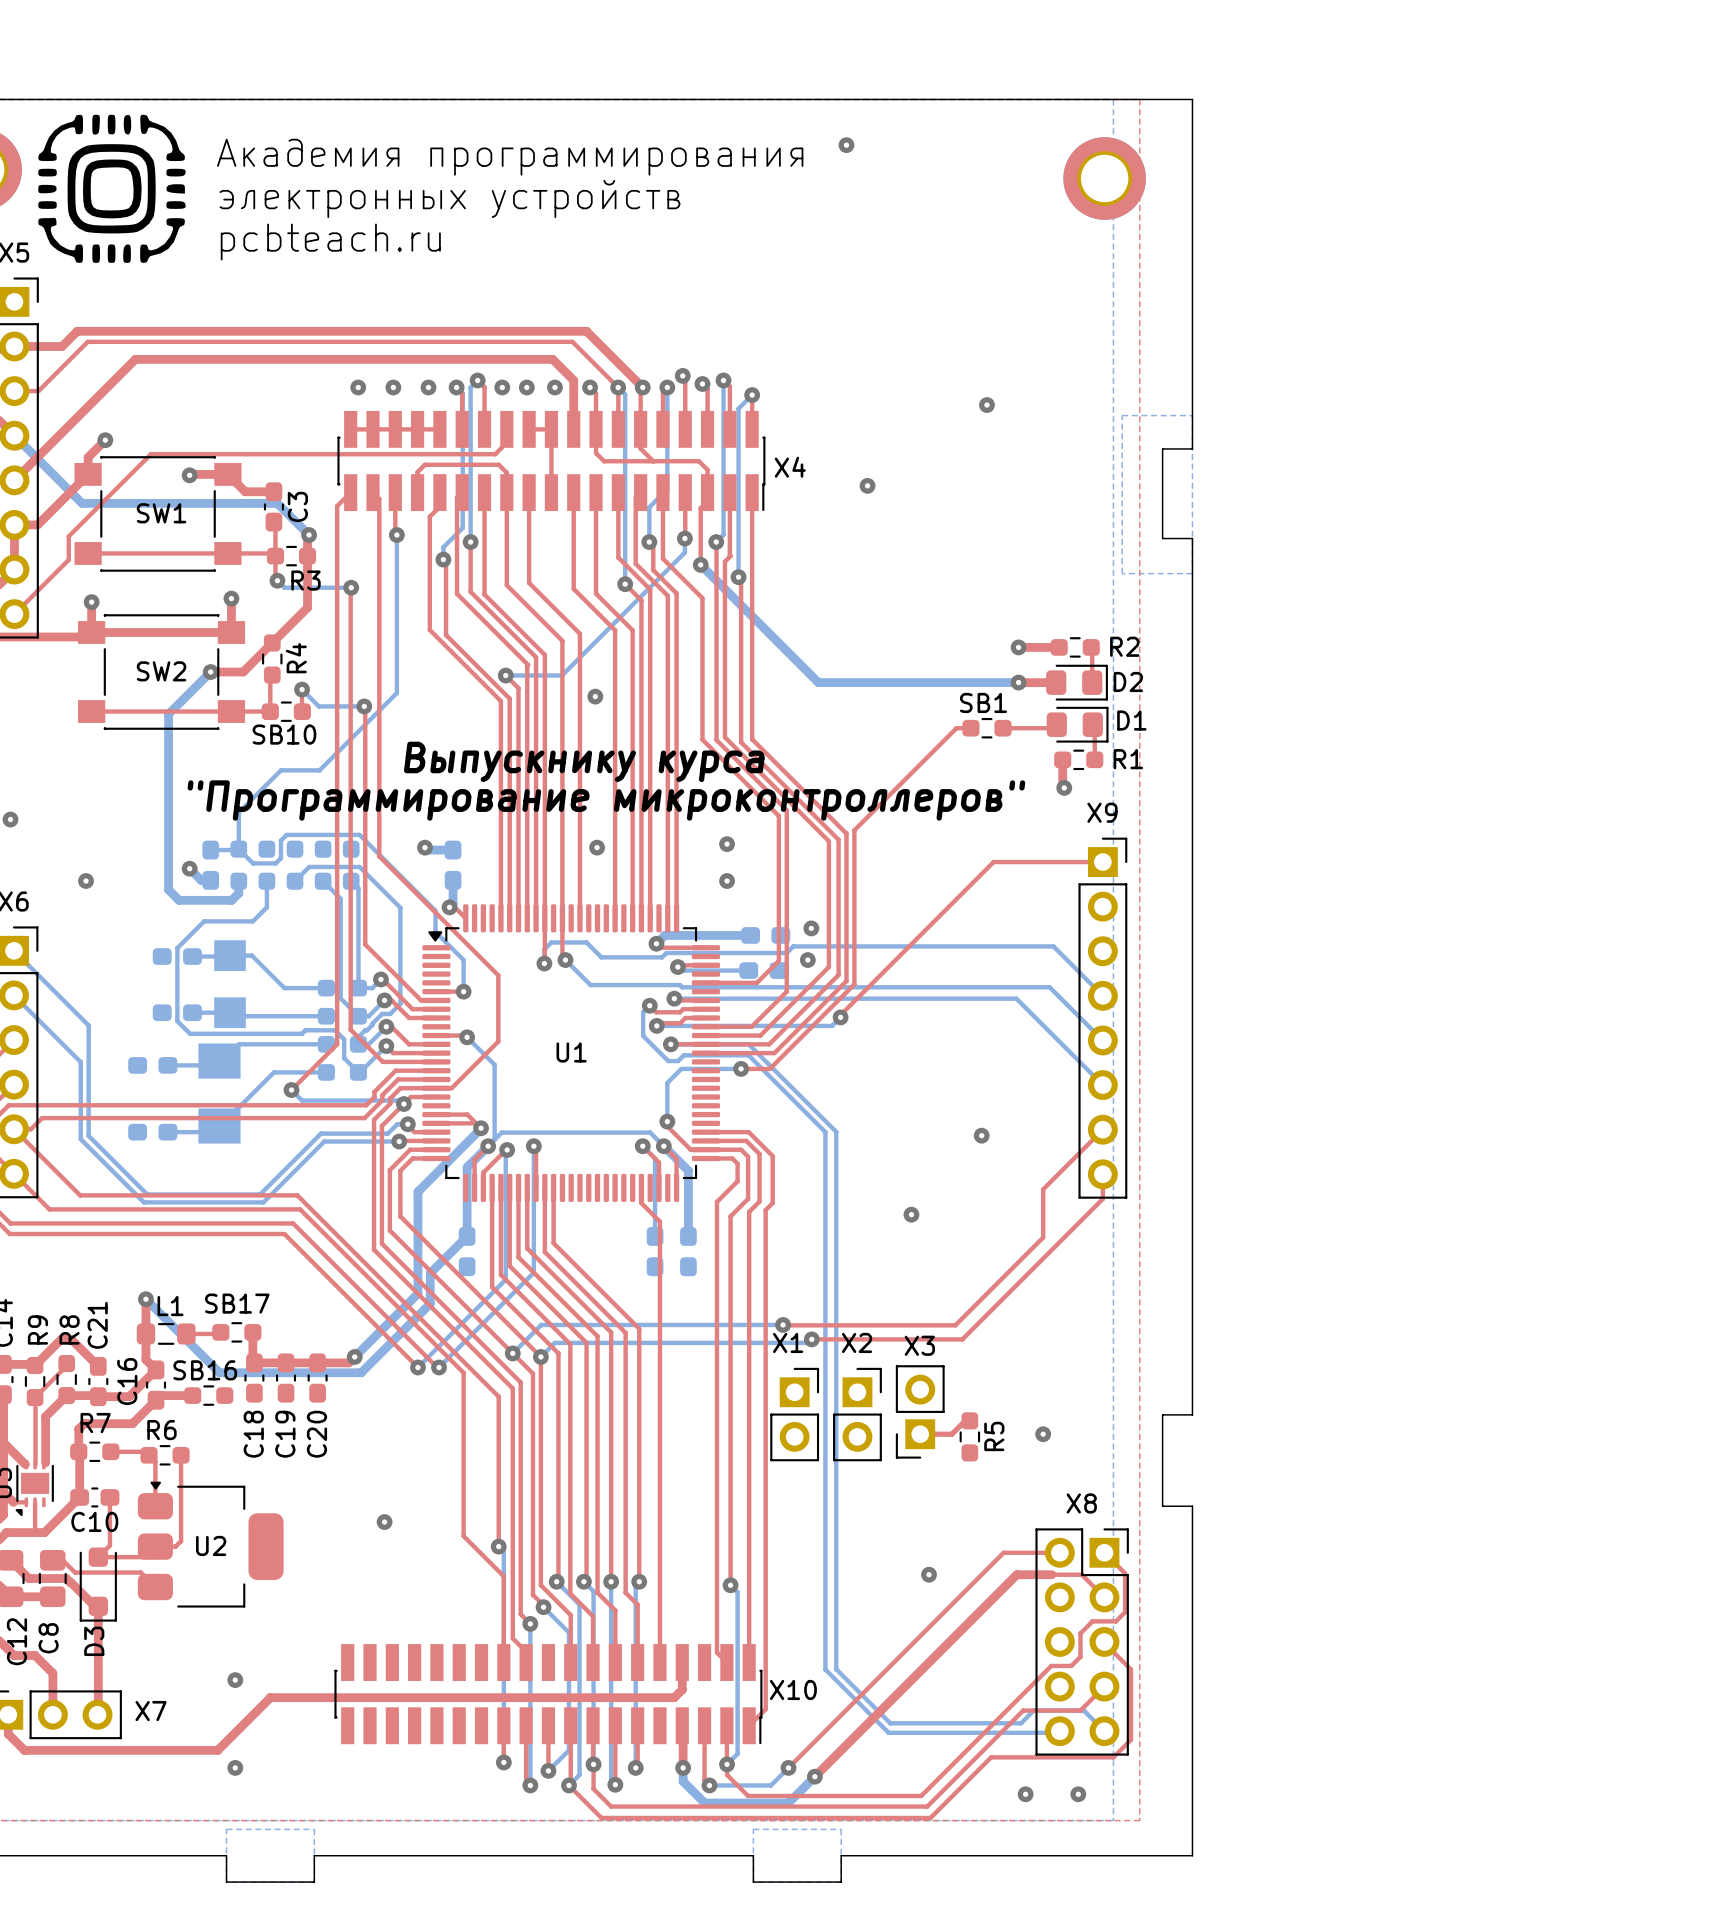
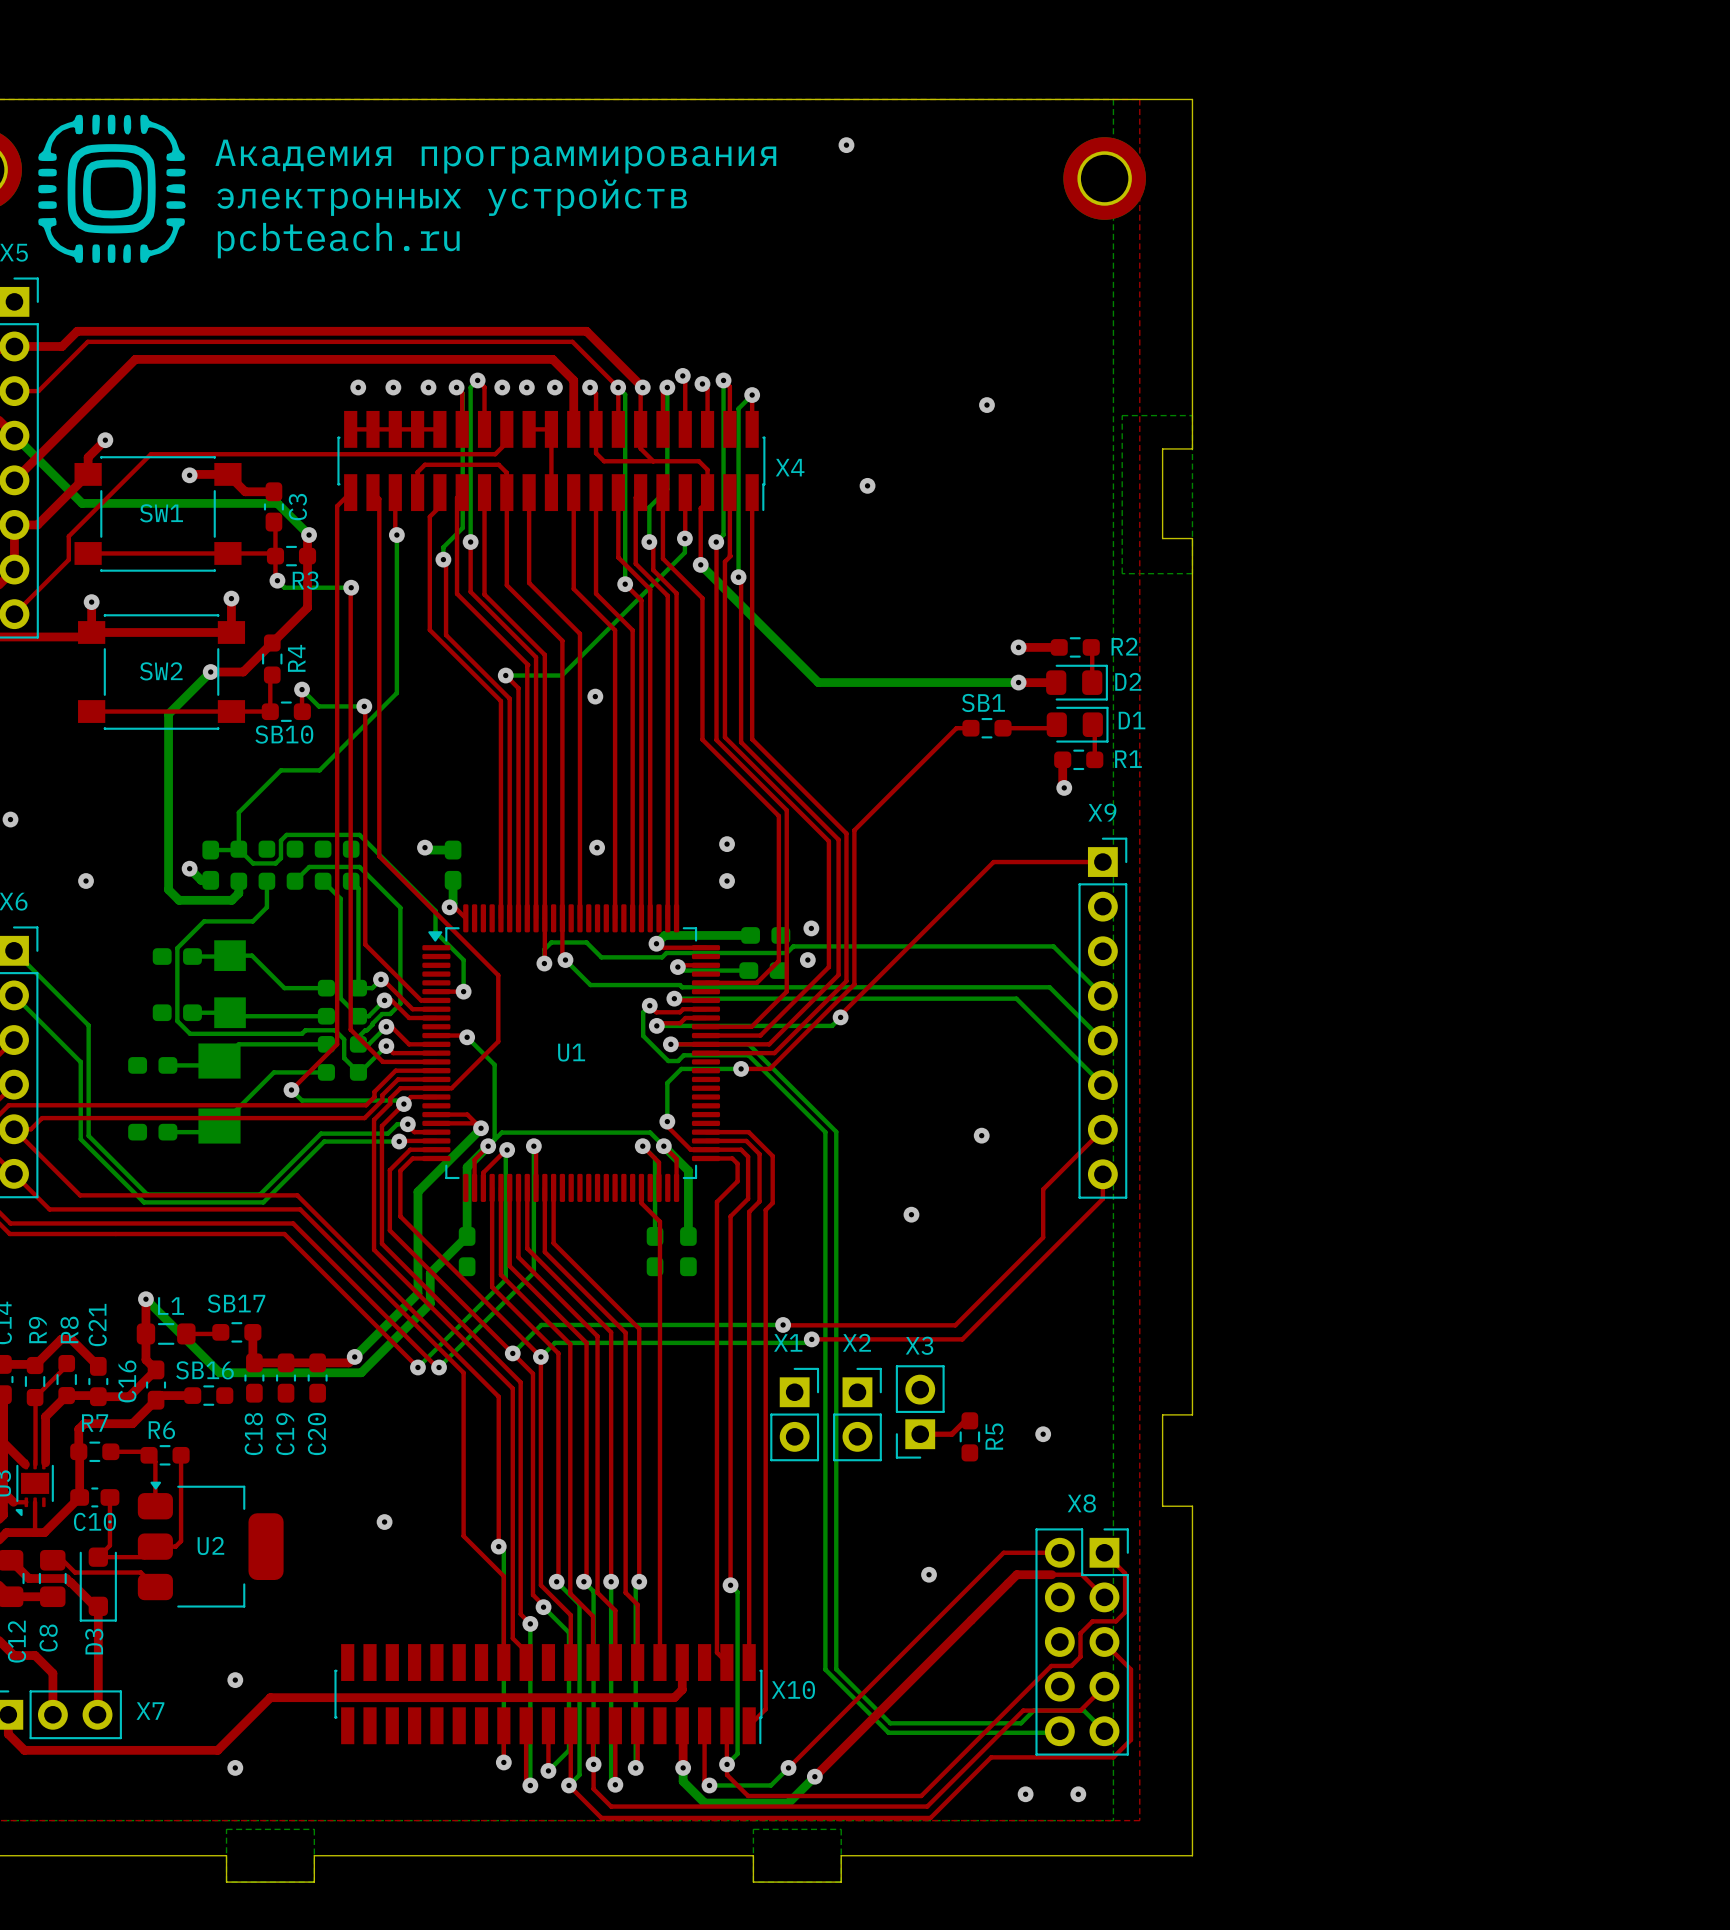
text: Выпускнику курса (584, 761) -> none
text: "Программирование микроконтроллеров" (606, 800) -> none

